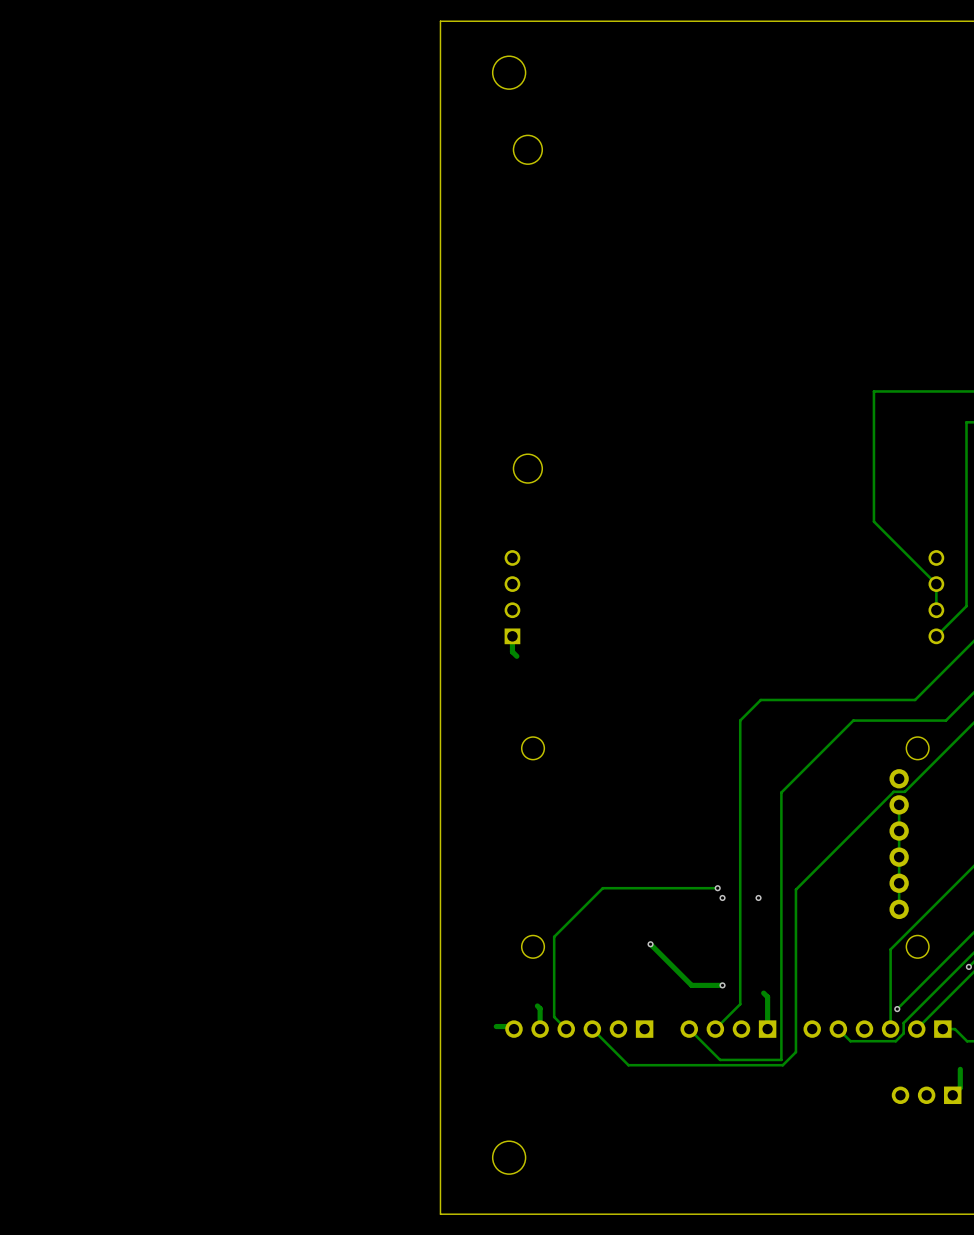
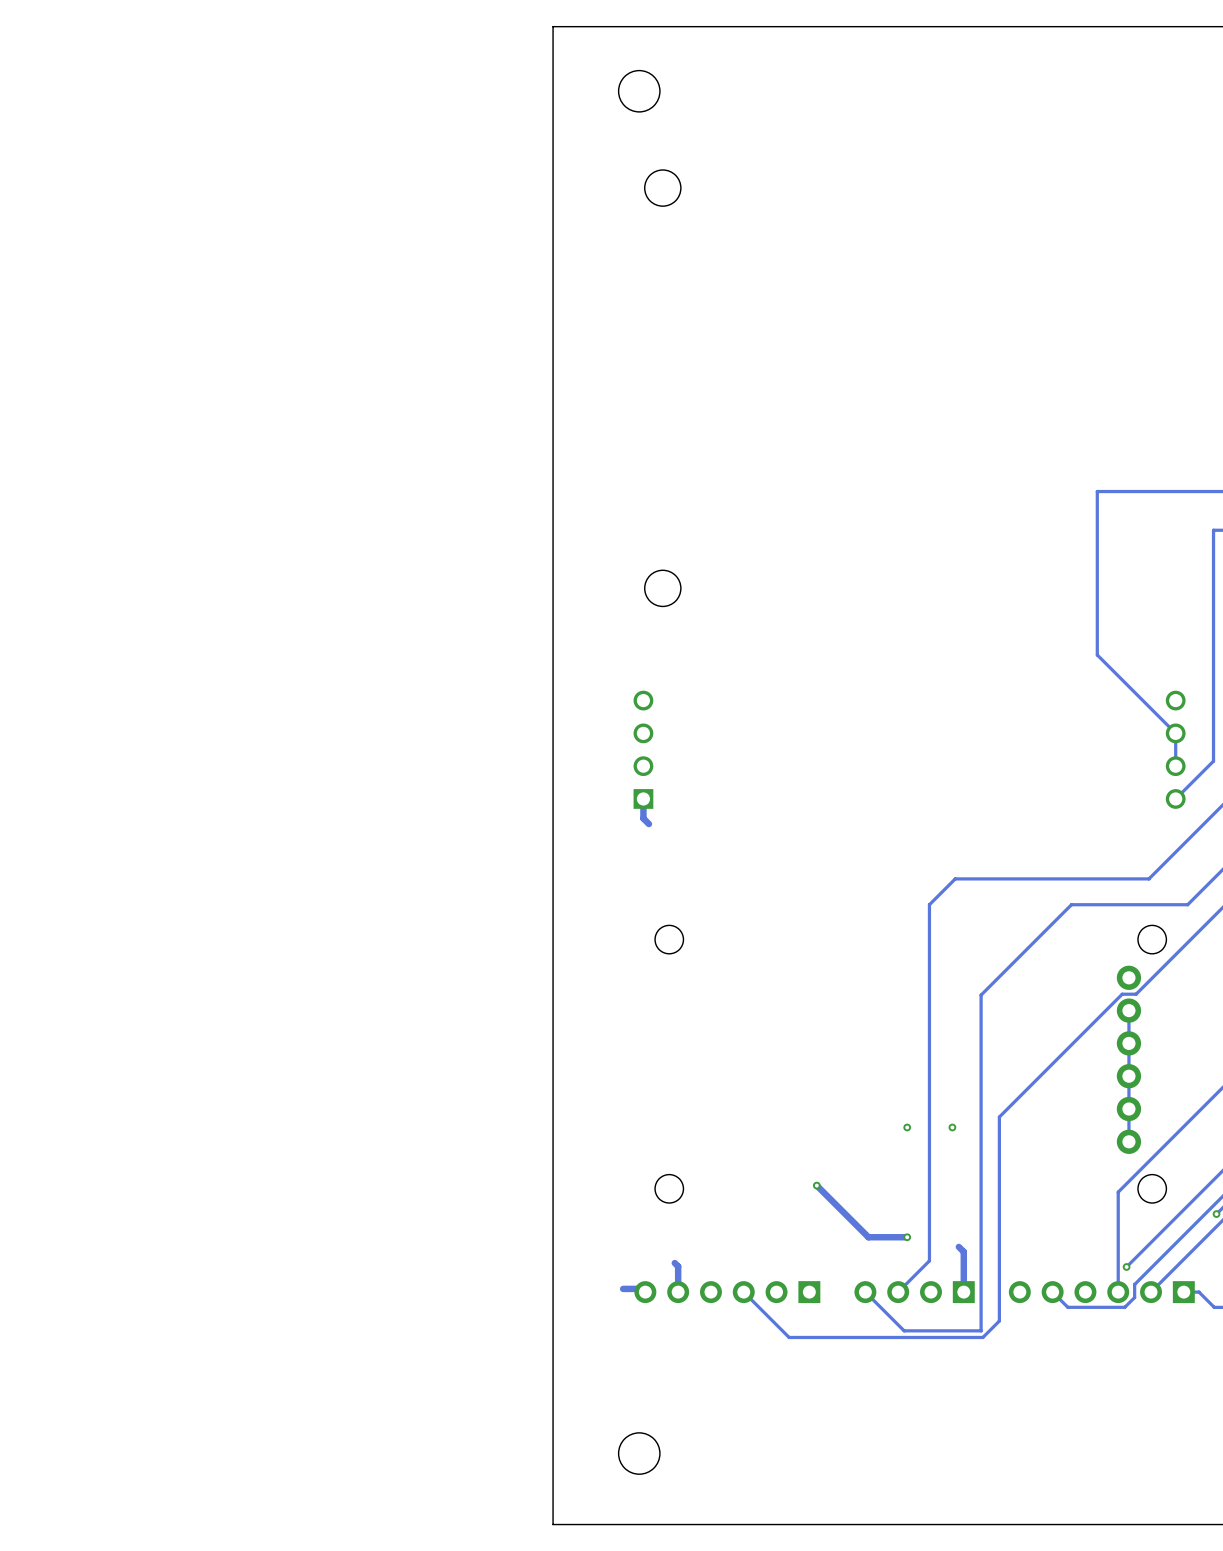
track: (717, 888) (602, 888) (554, 936) (554, 1017) (566, 1029) -> none
via: (717, 888) -> none
track: (960, 1069) (960, 1087) (952, 1095) -> none
part: (926, 1095) -> none

